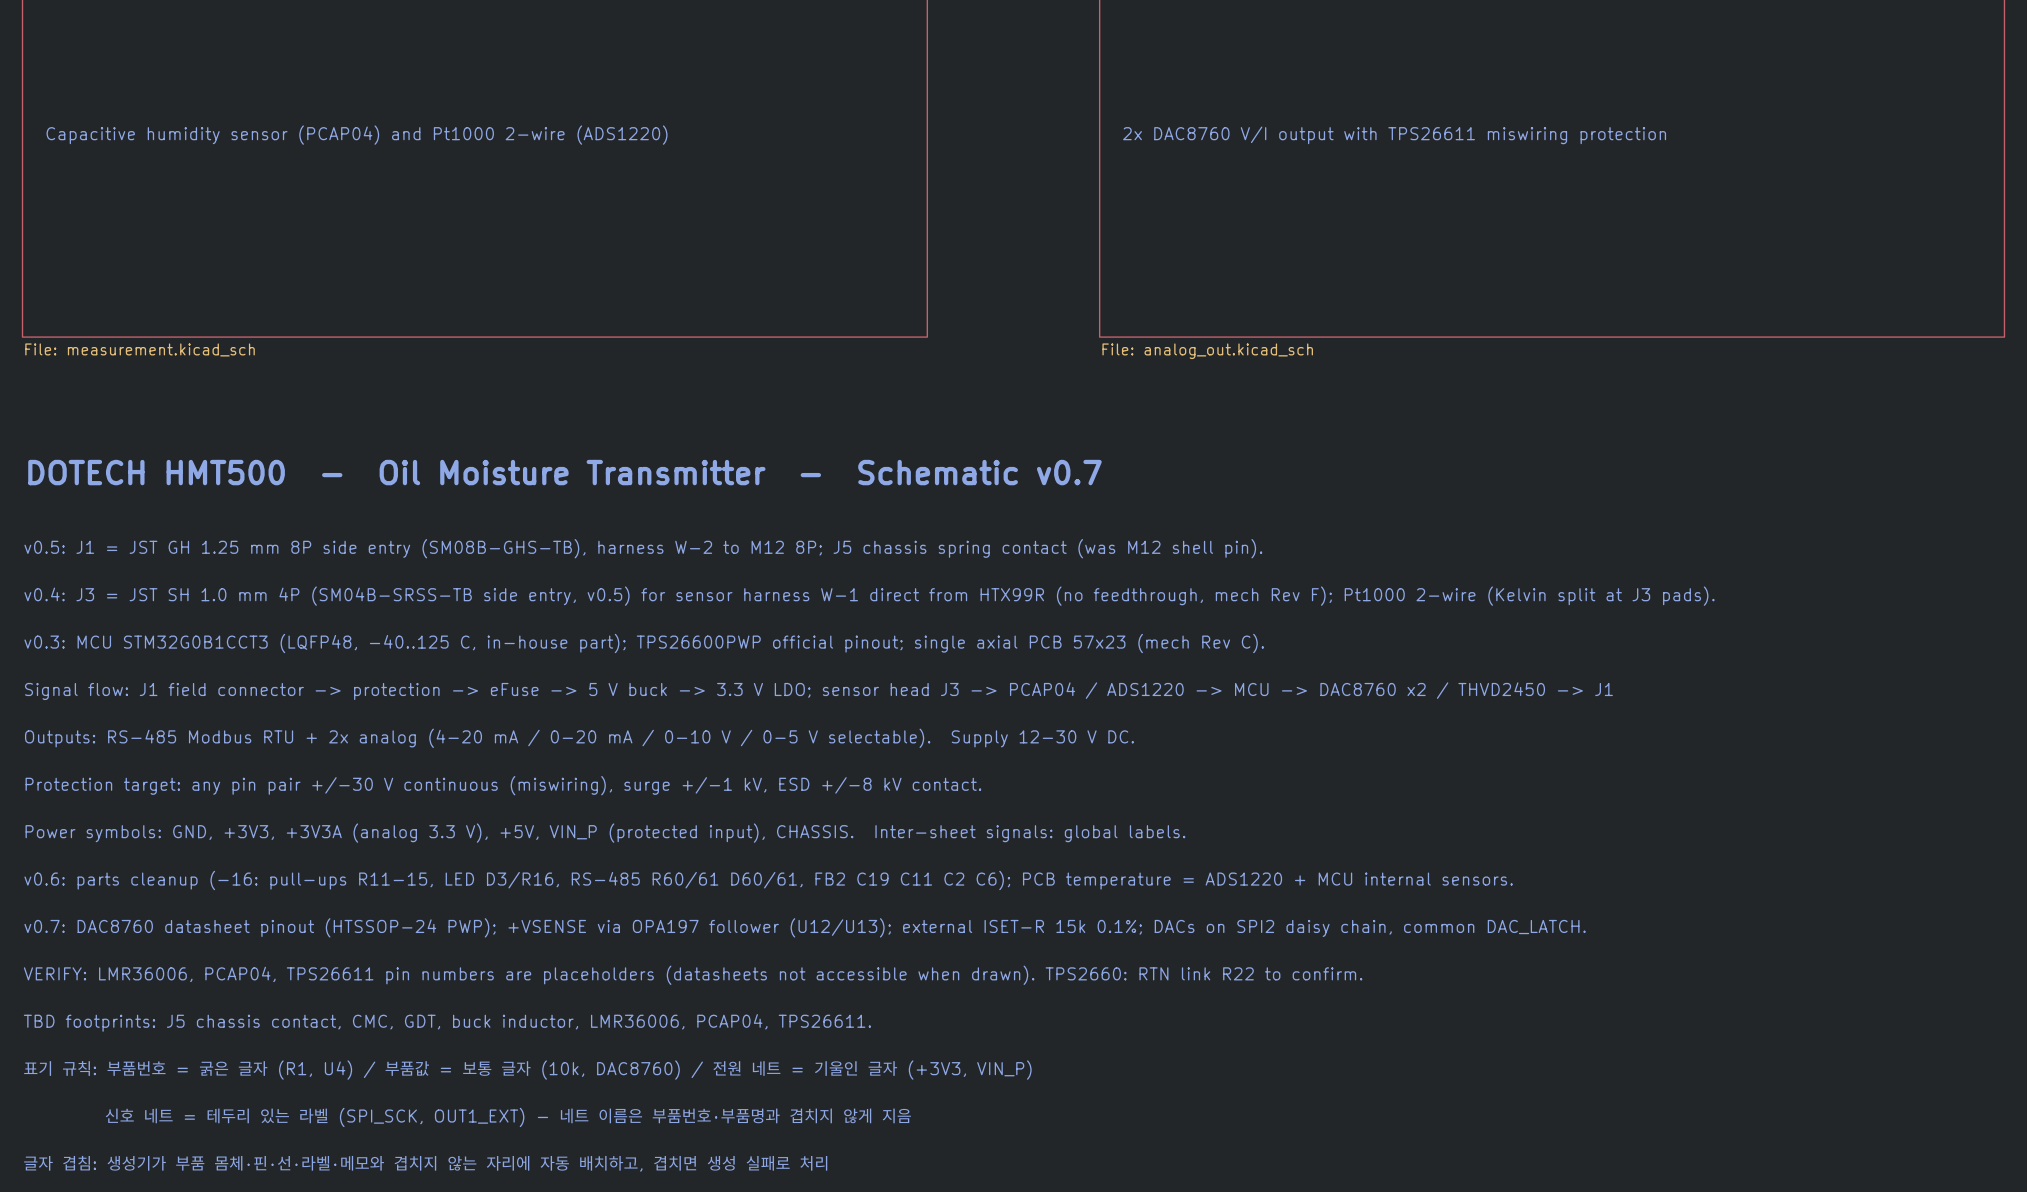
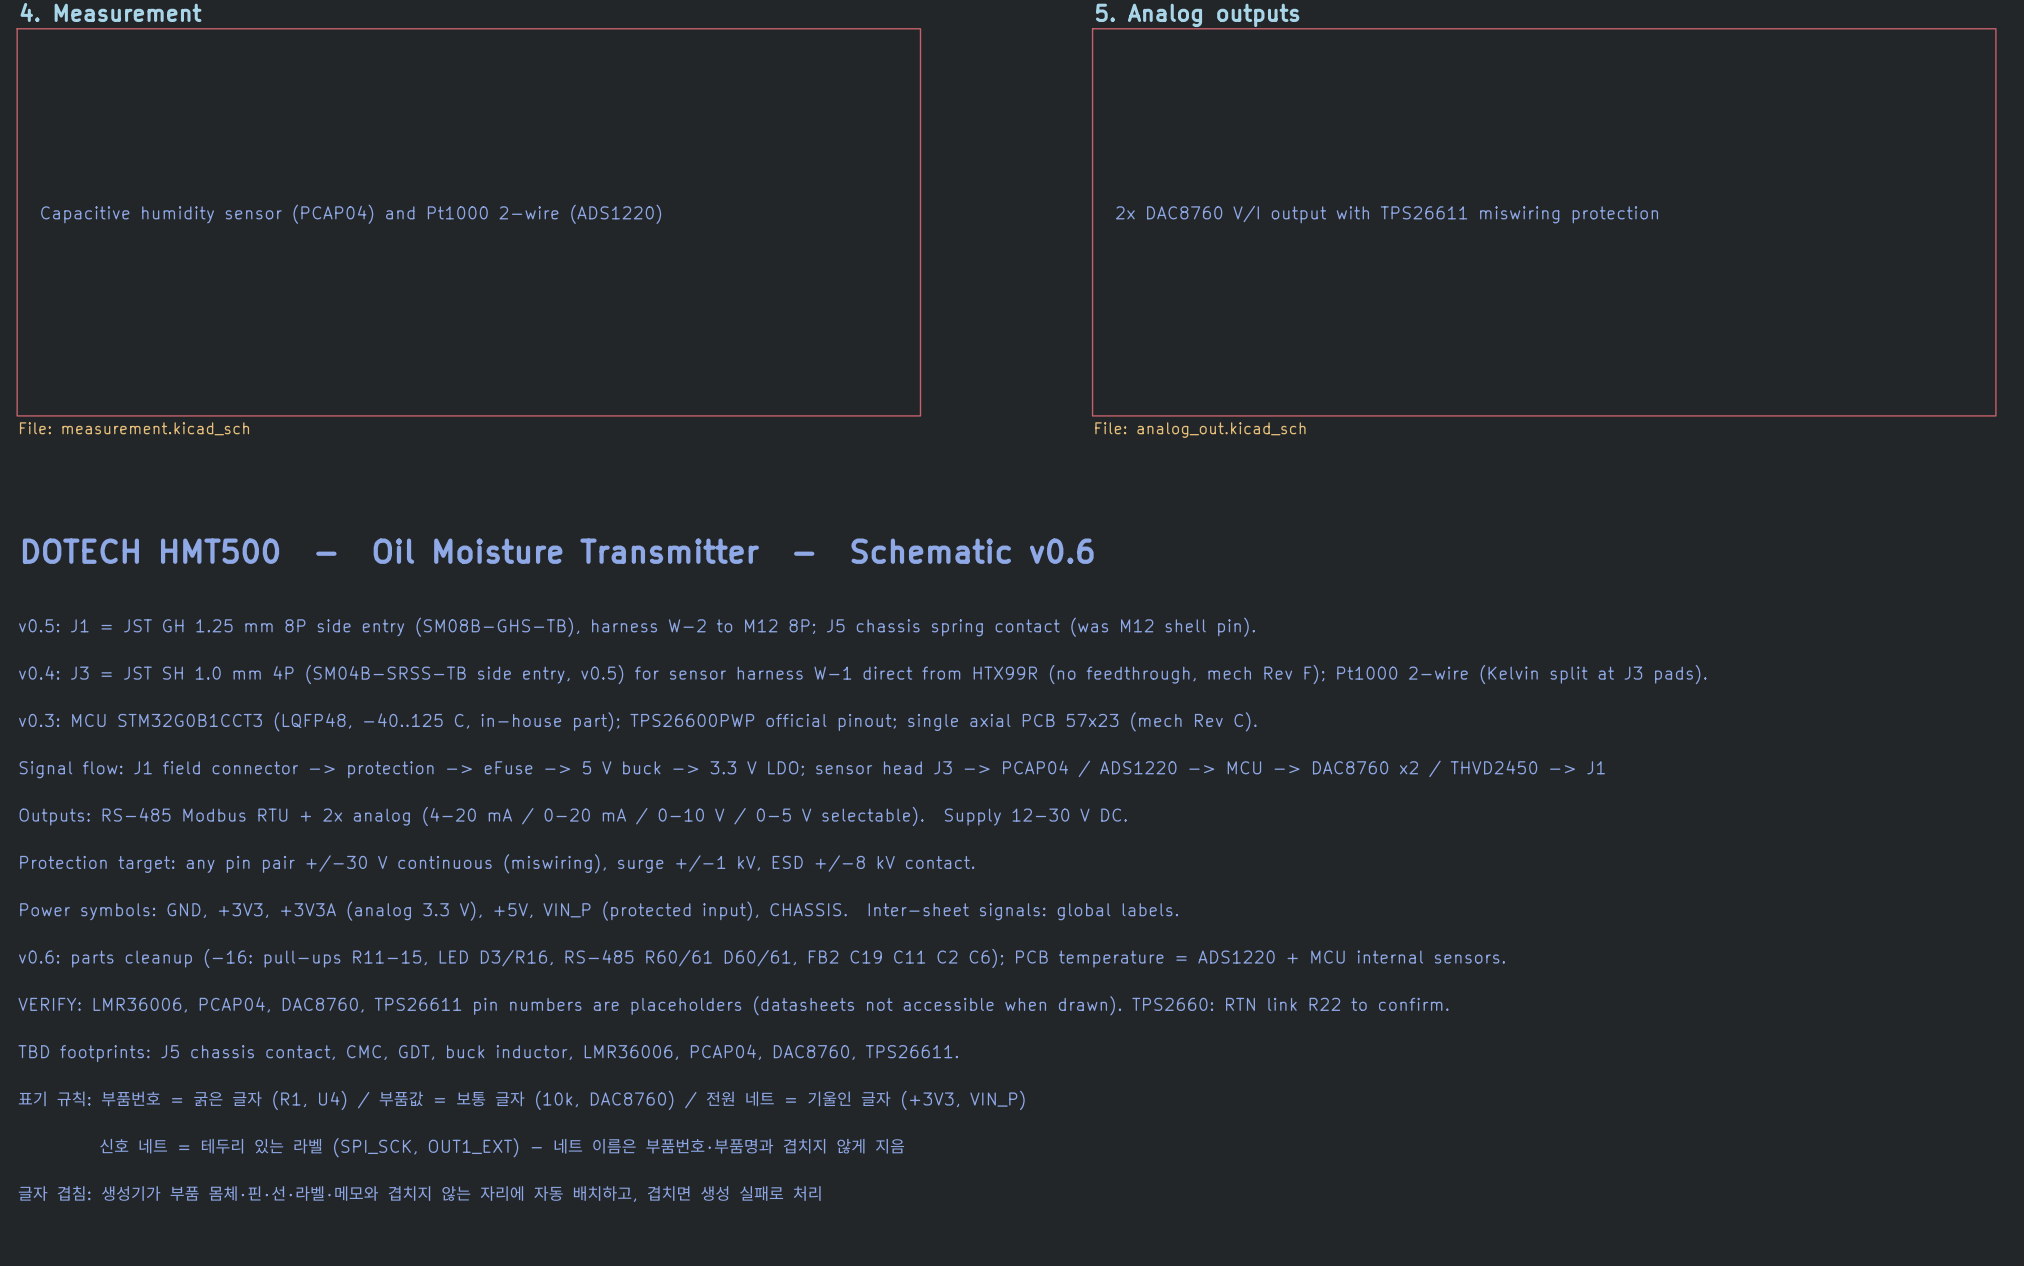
text: DOTECH HMT500 - Oil Moisture Transmitter - Schematic v0.7 (564, 472) -> DOTECH HMT500 - Oil Moisture Transmitter - Schematic v0.6 (558, 551)
text: v0.7: DAC8760 datasheet pinout (HTSSOP-24 PWP); +VSENSE via OPA197 follower (U12/U13); external ISET-R 15k 0.1%; DACs on SPI2 daisy chain, common DAC_LATCH. (805, 927) -> VERIFY: LMR36006, PCAP04, DAC8760, TPS26611 pin numbers are placeholders (datasheets not accessible when drawn). TPS2660: RTN link R22 to confirm. (733, 1005)
text: VERIFY: LMR36006, PCAP04, TPS26611 pin numbers are placeholders (datasheets not accessible when drawn). TPS2660: RTN link R22 to confirm. (693, 975) -> TBD footprints: J5 chassis contact, CMC, GDT, buck inductor, LMR36006, PCAP04, DAC8760, TPS26611. (488, 1053)
text: TBD footprints: J5 chassis contact, CMC, GDT, buck inductor, LMR36006, PCAP04, TPS26611. (447, 1022) -> 표기 규칙: 부품번호 = 굵은 글자 (R1, U4) / 부품값 = 보통 글자 (10k, DAC8760) / 전원 네트 = 기울인 글자 (+3V3, VIN_P) (521, 1100)
text: 표기 규칙: 부품번호 = 굵은 글자 (R1, U4) / 부품값 = 보통 글자 (10k, DAC8760) / 전원 네트 = 기울인 글자 (+3V3, VIN_P) (527, 1070) -> 신호 네트 = 테두리 있는 라벨 (SPI_SCK, OUT1_EXT) - 네트 이름은 부품번호·부품명과 겹치지 않게 지음 (502, 1147)
text: 신호 네트 = 테두리 있는 라벨 (SPI_SCK, OUT1_EXT) - 네트 이름은 부품번호·부품명과 겹치지 않게 지음 (508, 1117) -> 글자 겹침: 생성기가 부품 몸체·핀·선·라벨·메모와 겹치지 않는 자리에 자동 배치하고, 겹치면 생성 실패로 처리 (419, 1193)
text: 글자 겹침: 생성기가 부품 몸체·핀·선·라벨·메모와 겹치지 않는 자리에 자동 배치하고, 겹치면 생성 실패로 처리 (425, 1163) -> none

